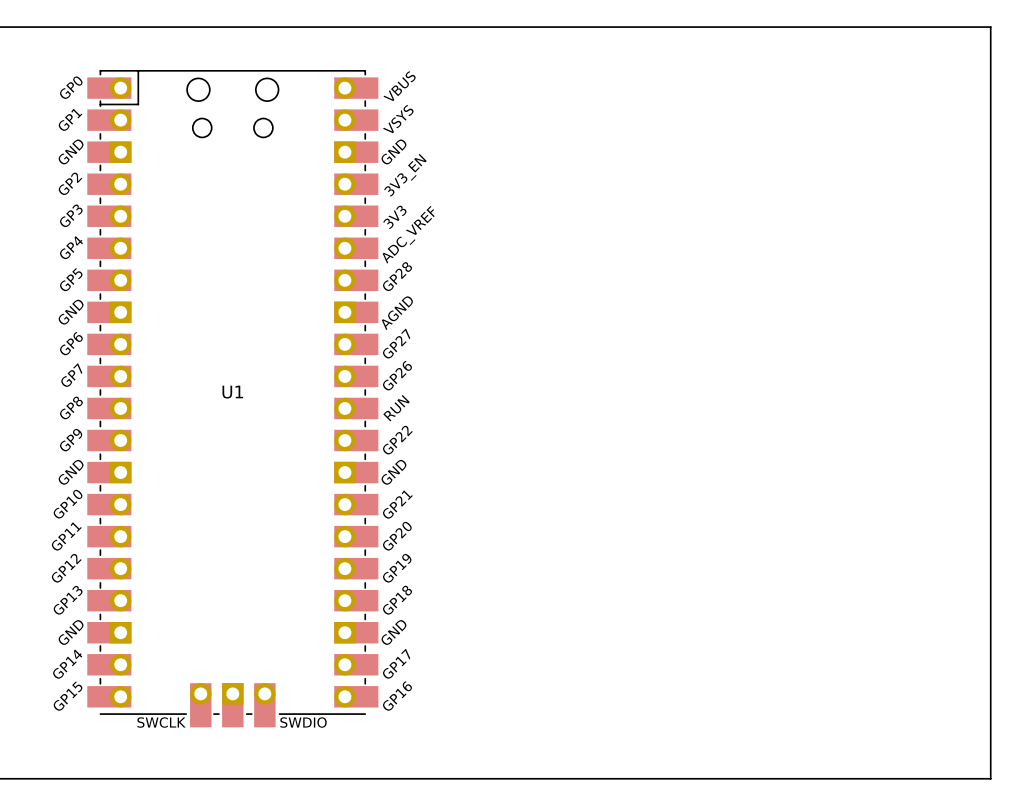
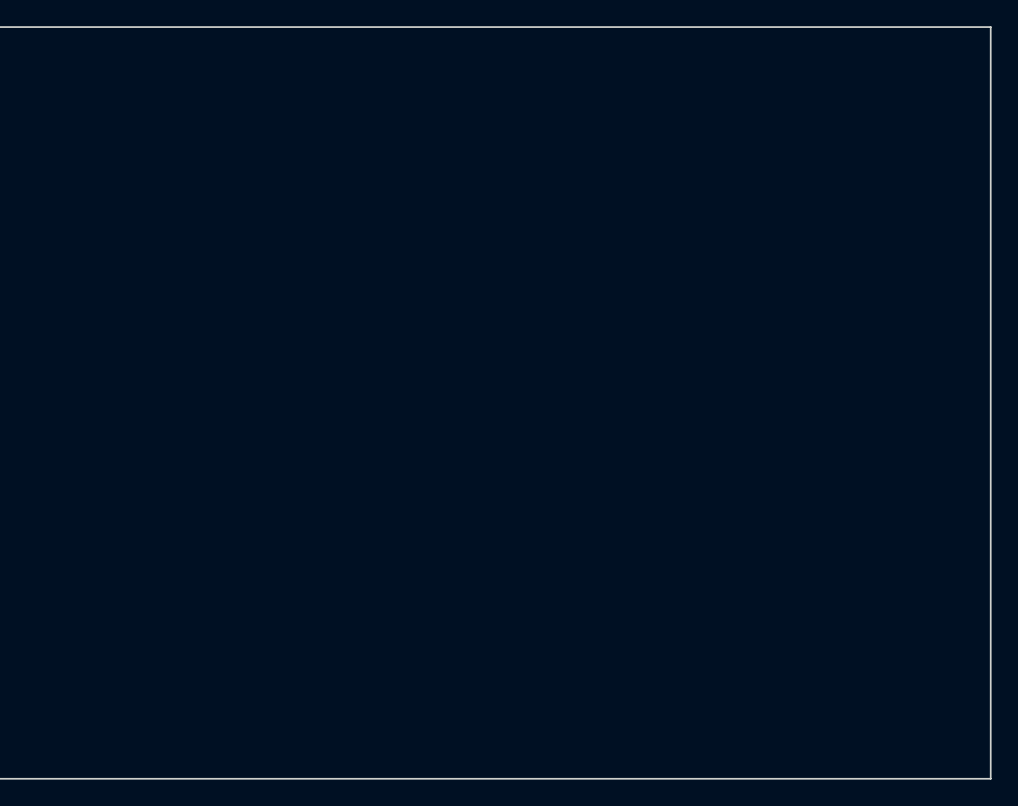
U1: (232, 398) -> none

